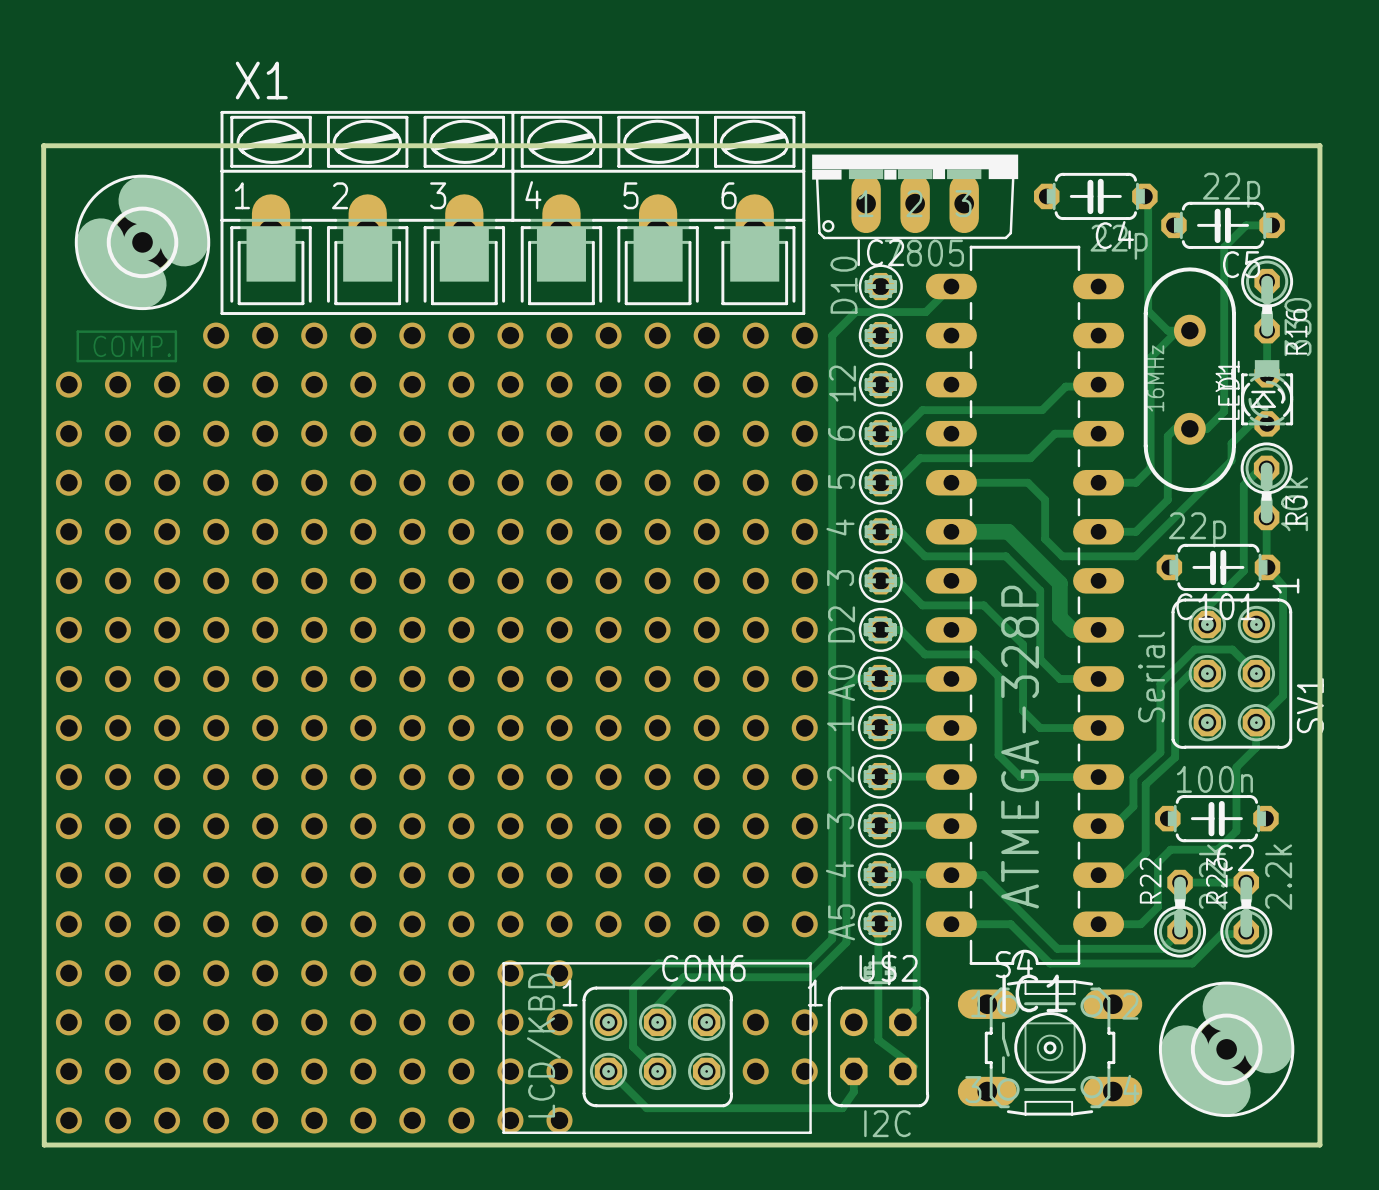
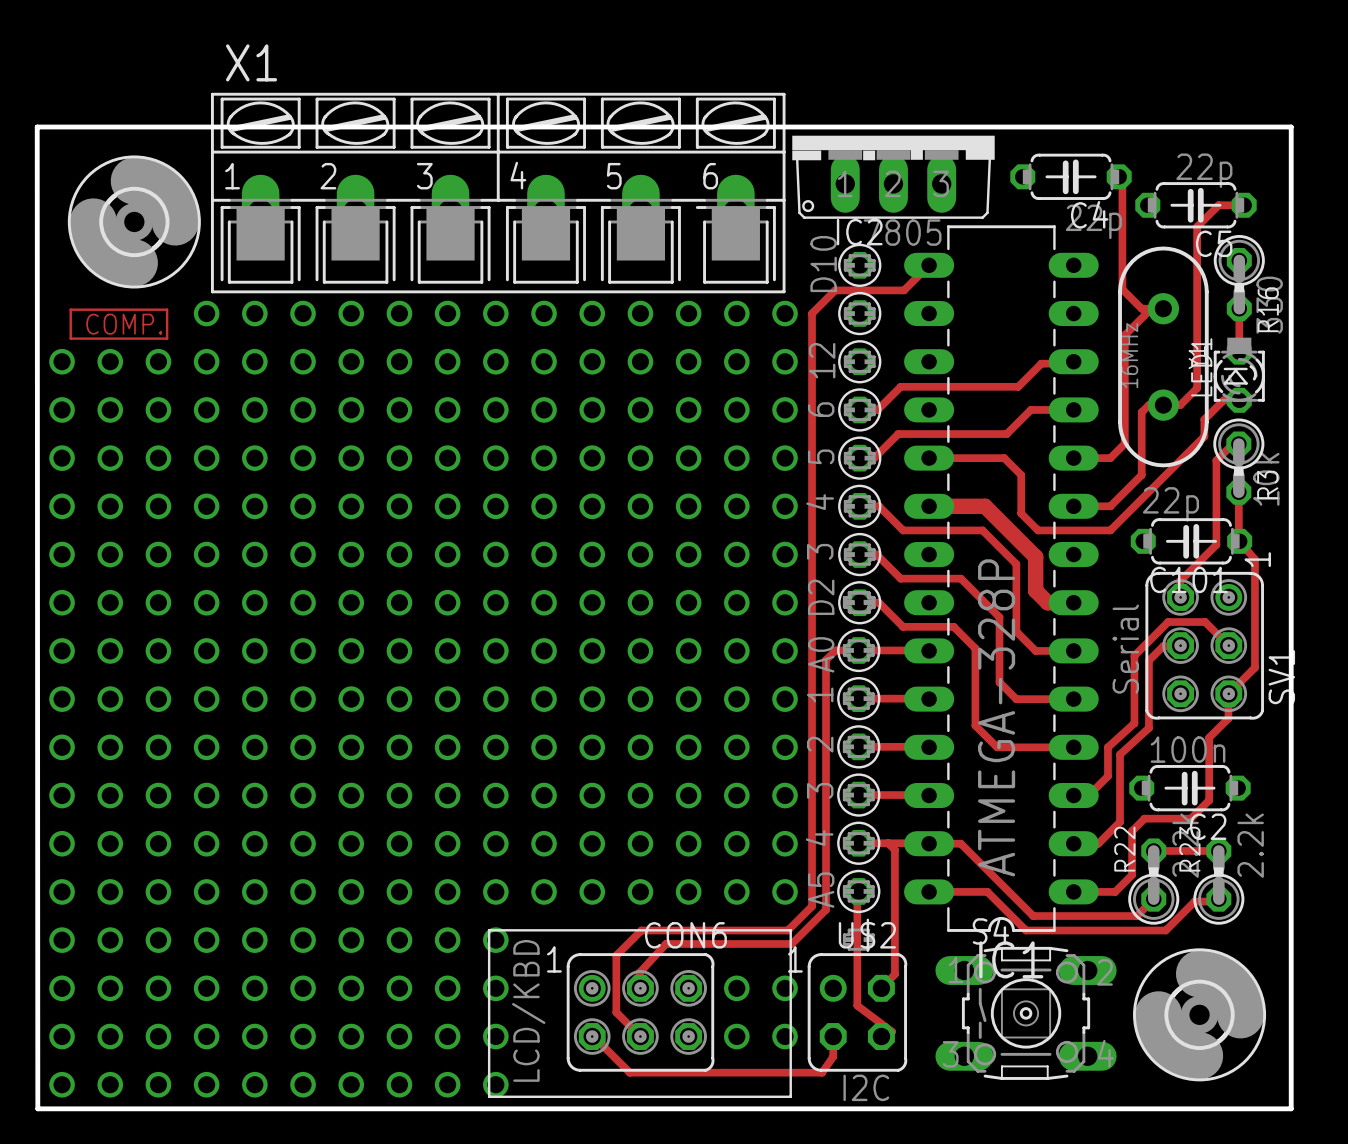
via: (559, 973) -> none
via: (559, 1022) -> none
via: (559, 1071) -> none
via: (559, 1120) -> none

